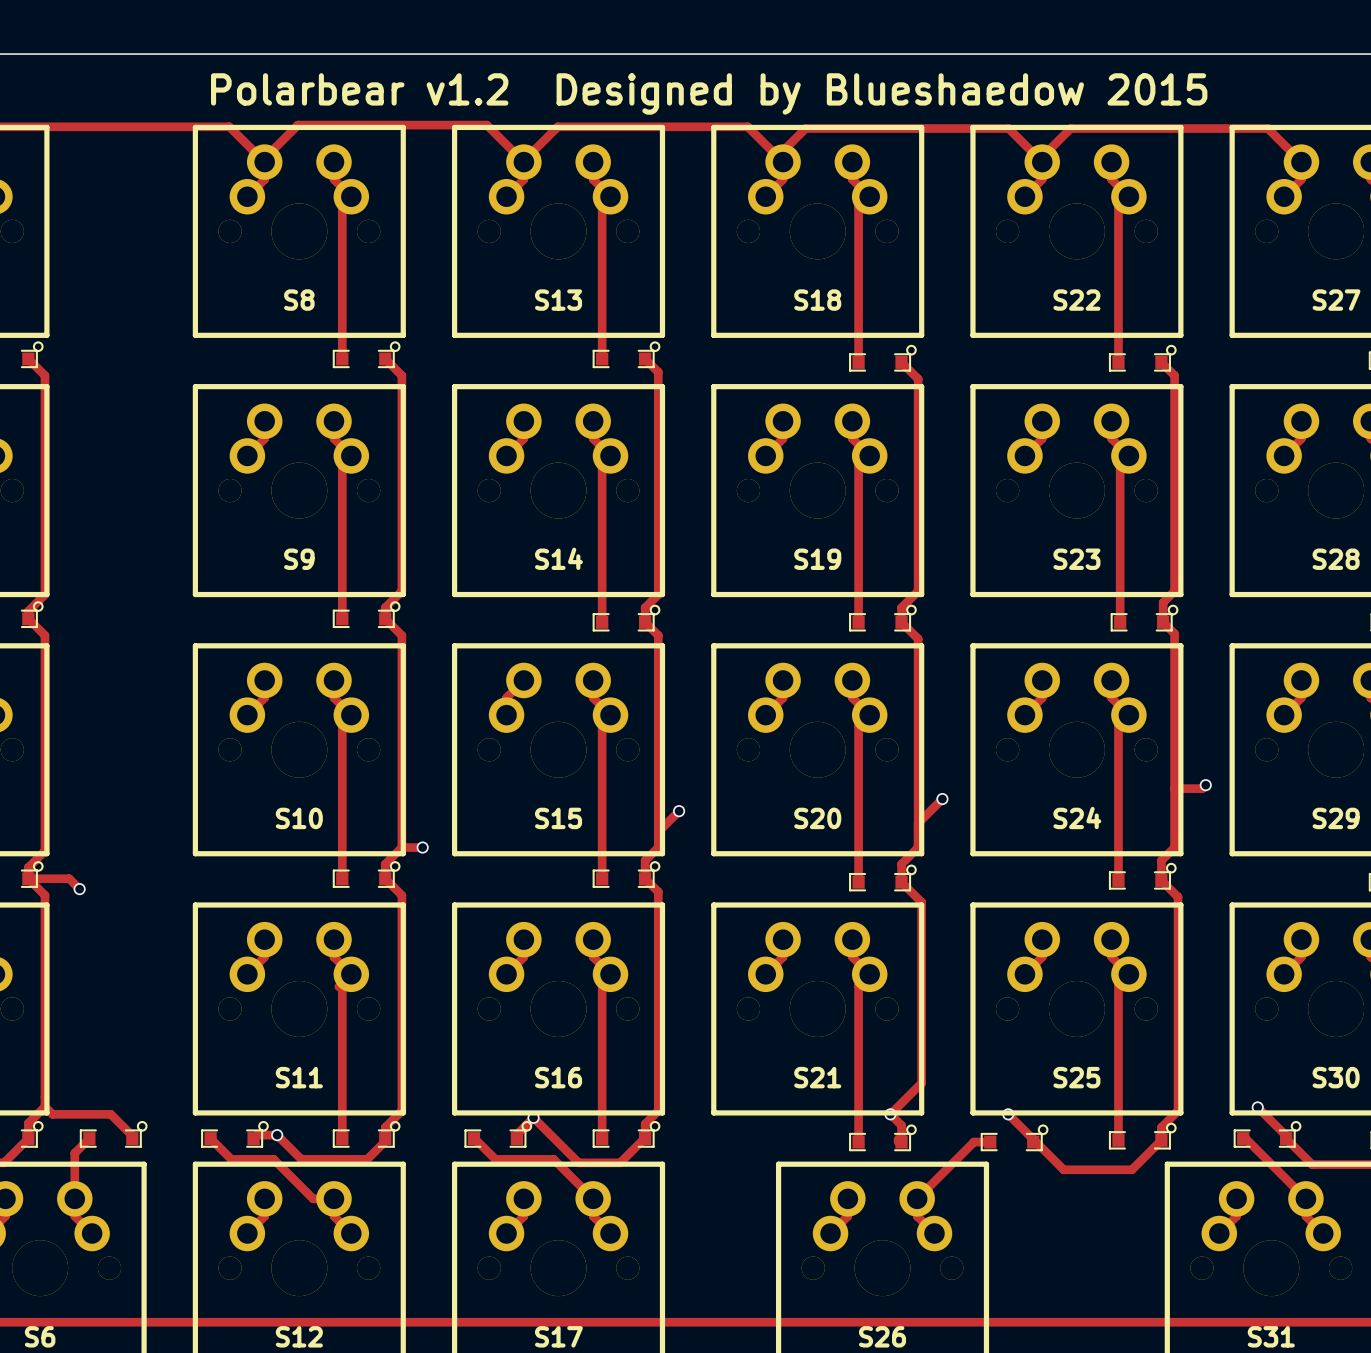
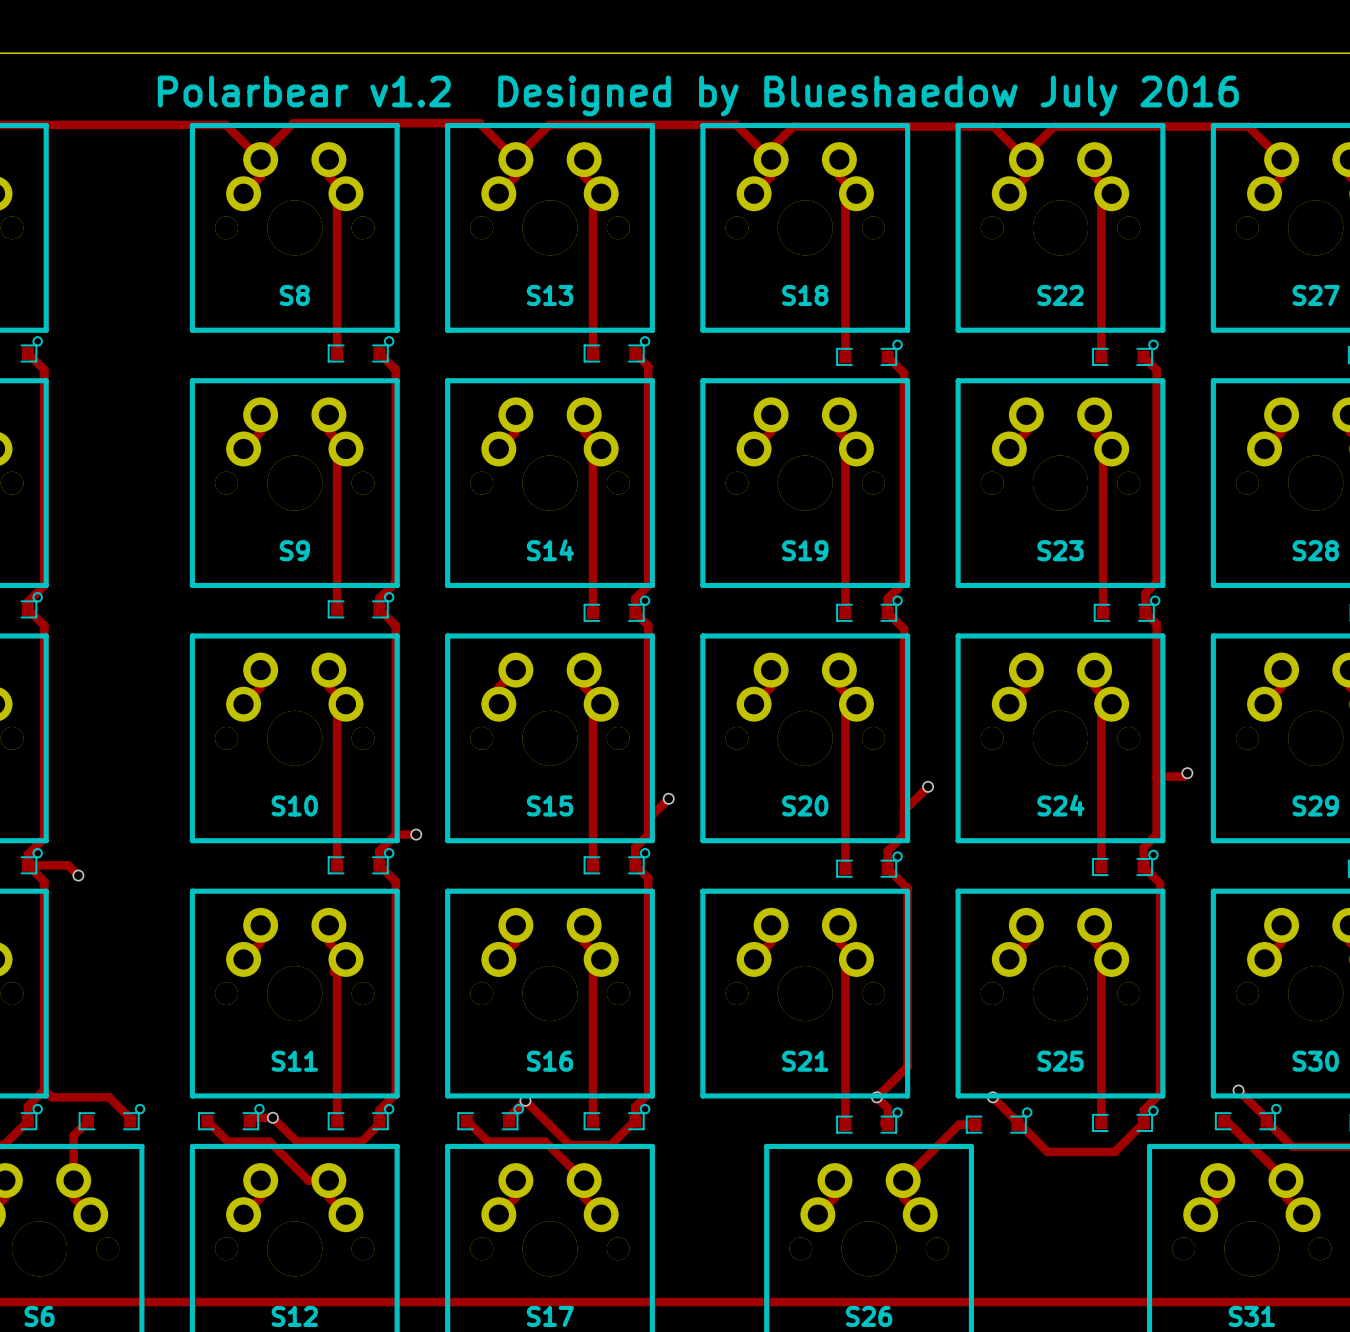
text: Polarbear v1.2 Designed by Blueshaedow 2015 (709, 93) -> Polarbear v1.2 Designed by Blueshaedow July 2016 (698, 95)

